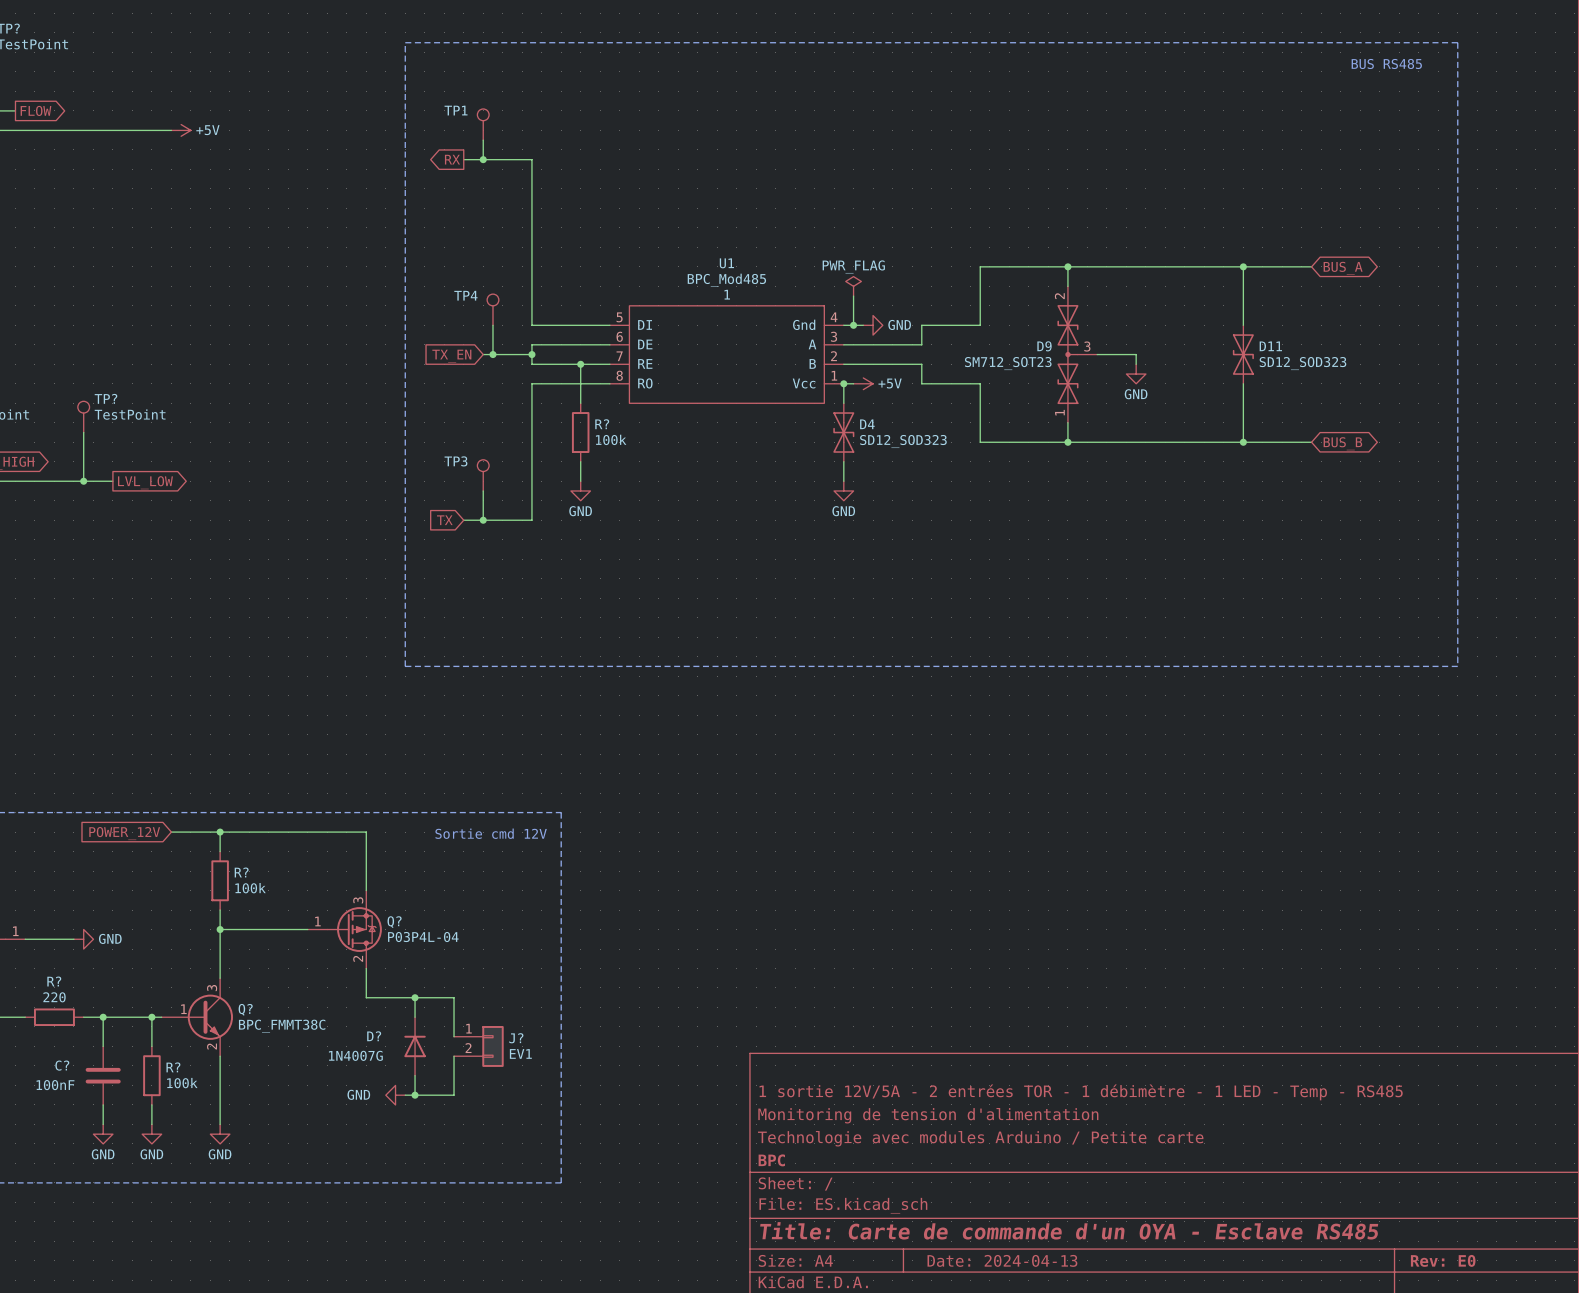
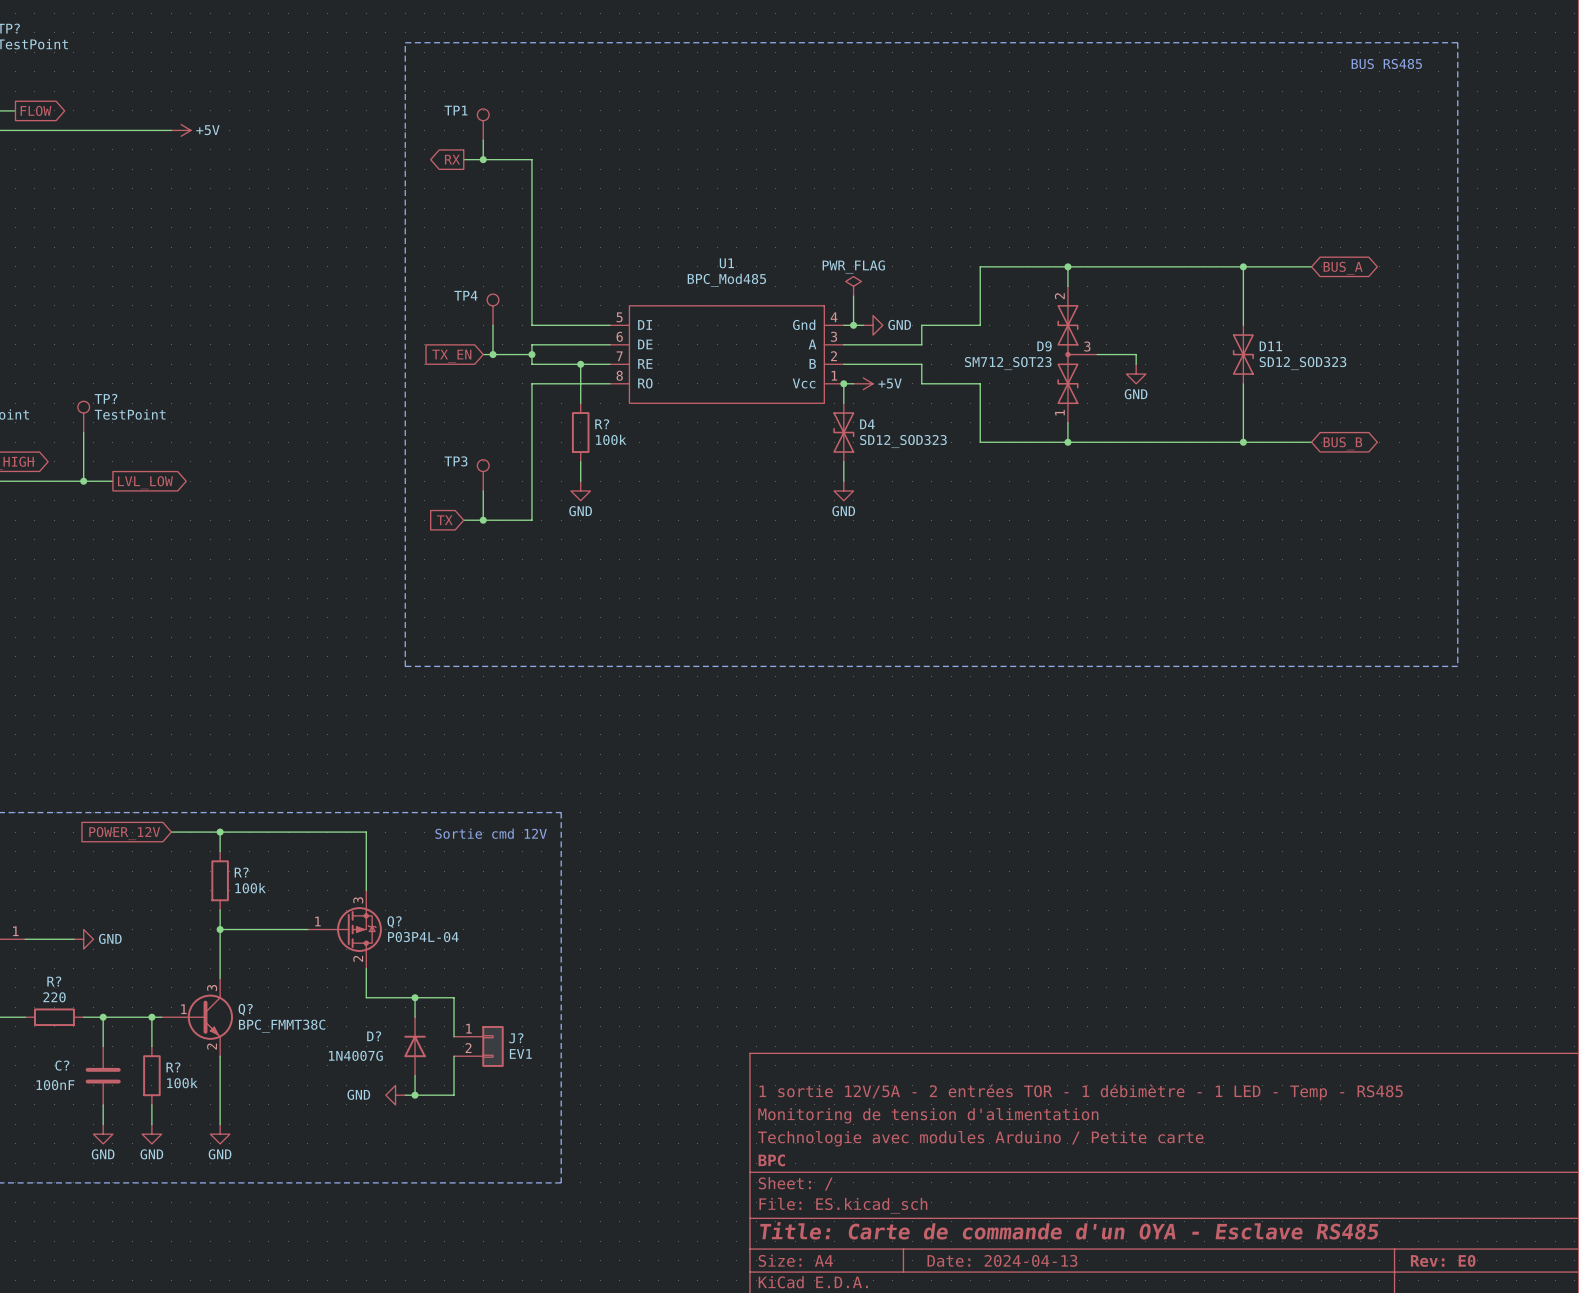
U1 text: 1 (727, 294) -> none

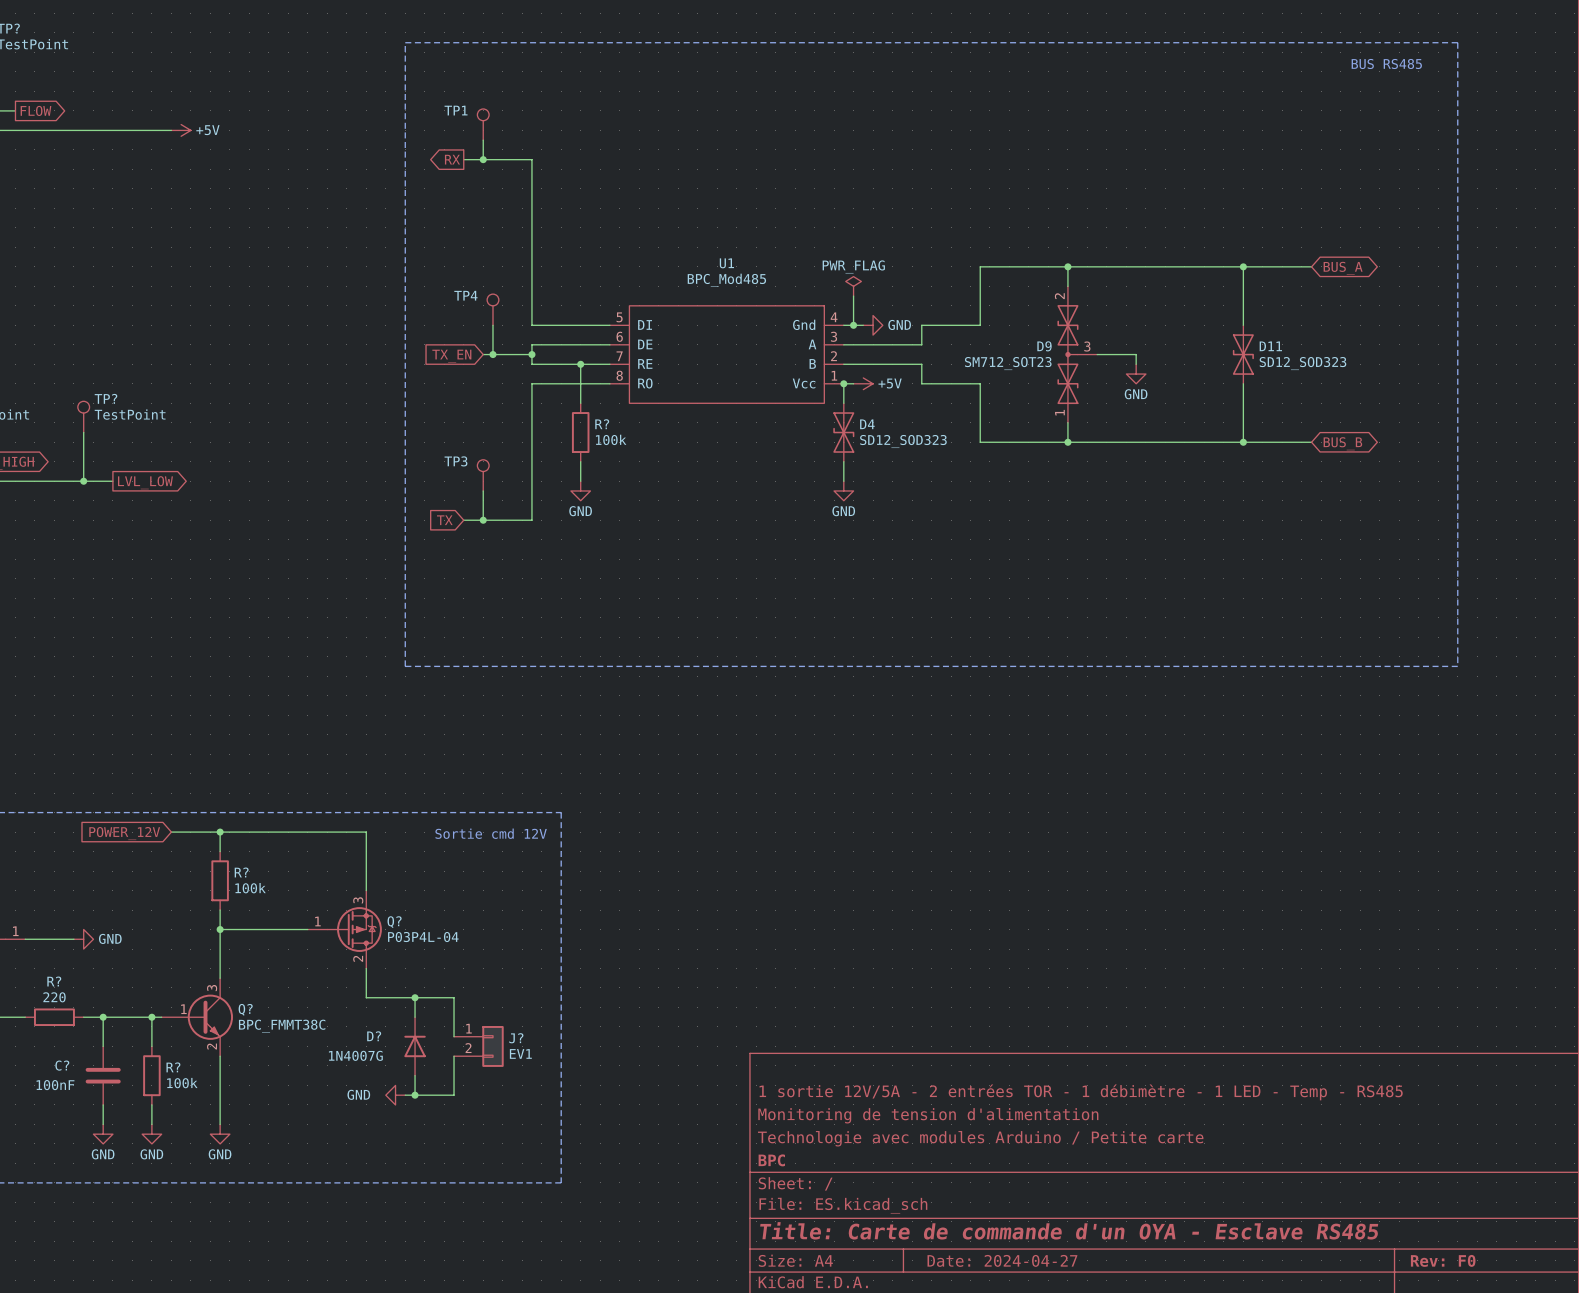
title block: Date: 2024-04-13 (1002, 1260) -> Date: 2024-04-27 (1002, 1260)
title block: Rev: E0 (1443, 1260) -> Rev: F0 (1443, 1260)

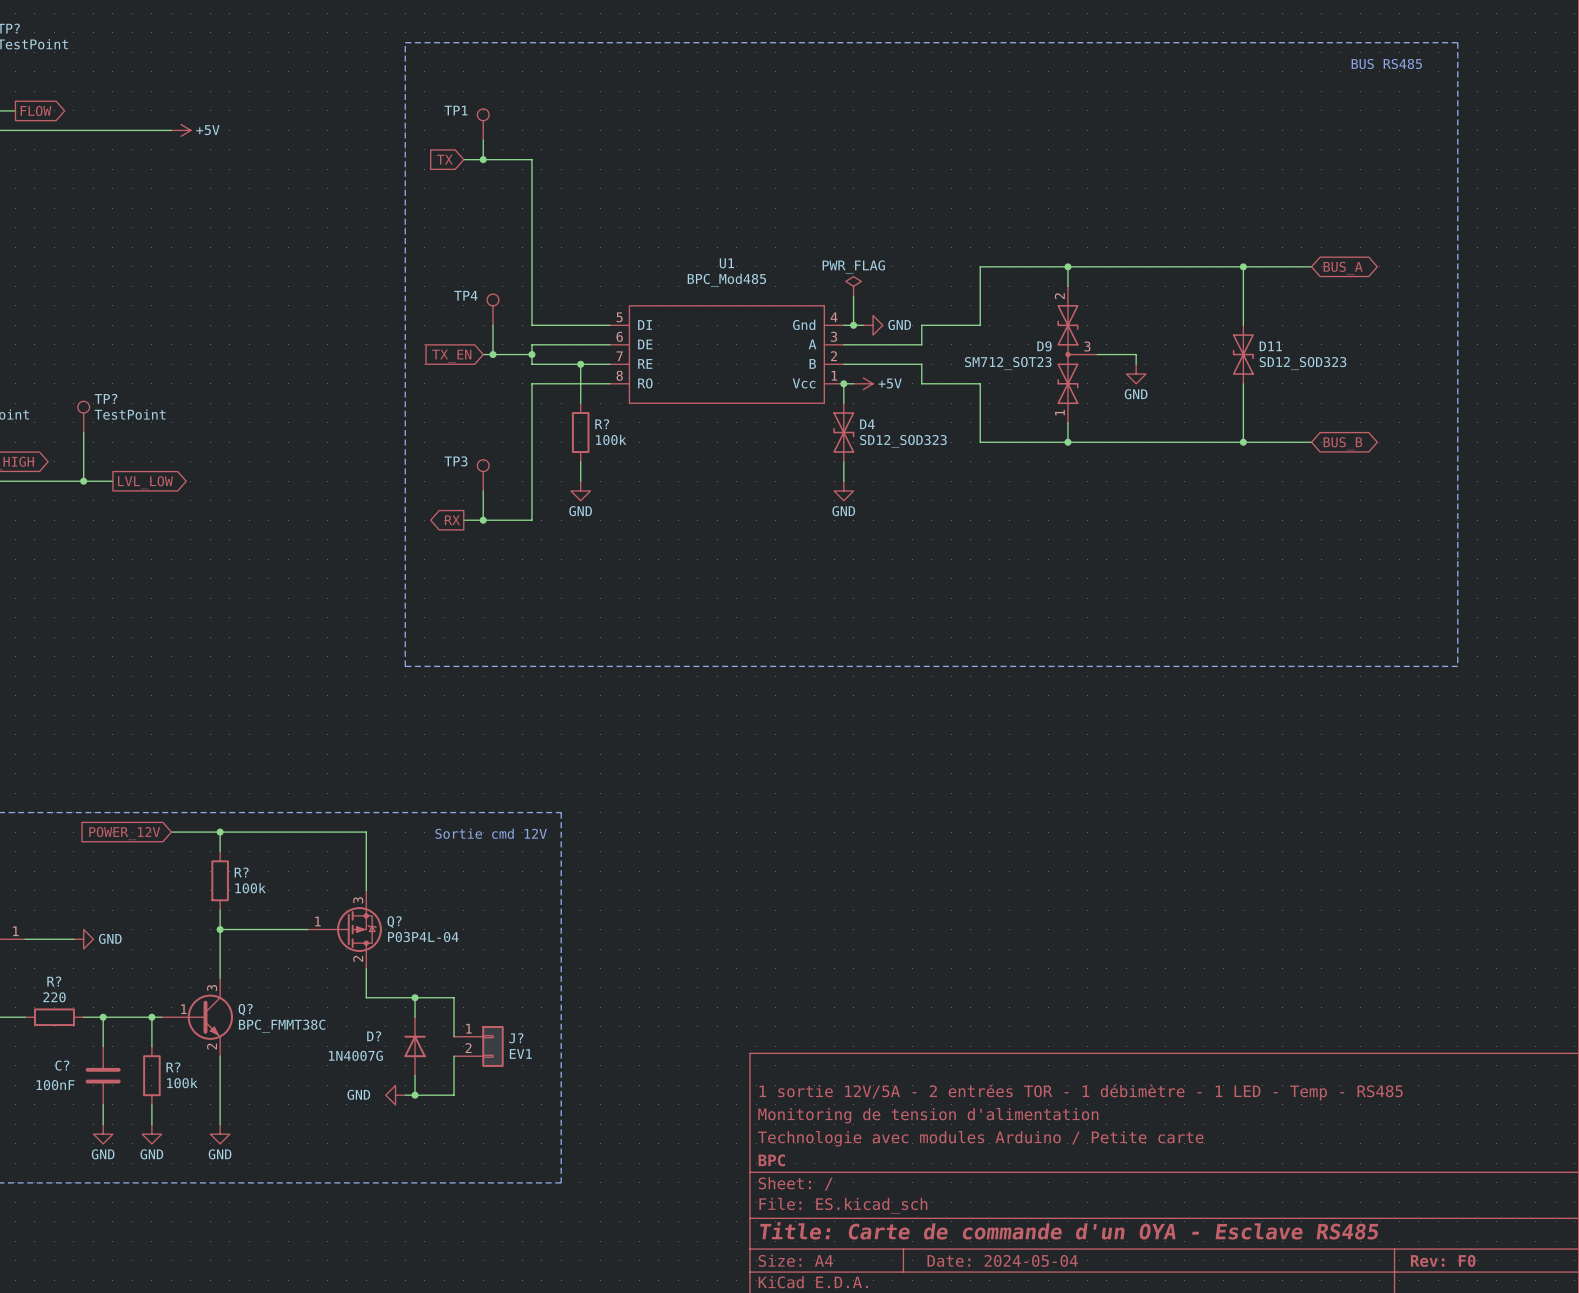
global label shape: output (452, 159) -> input (444, 159)
global label: RX (452, 159) -> TX (444, 159)
global label shape: input (444, 520) -> output (452, 520)
global label: TX (444, 520) -> RX (452, 520)
title block: Date: 2024-04-27 (1002, 1260) -> Date: 2024-05-04 (1002, 1260)

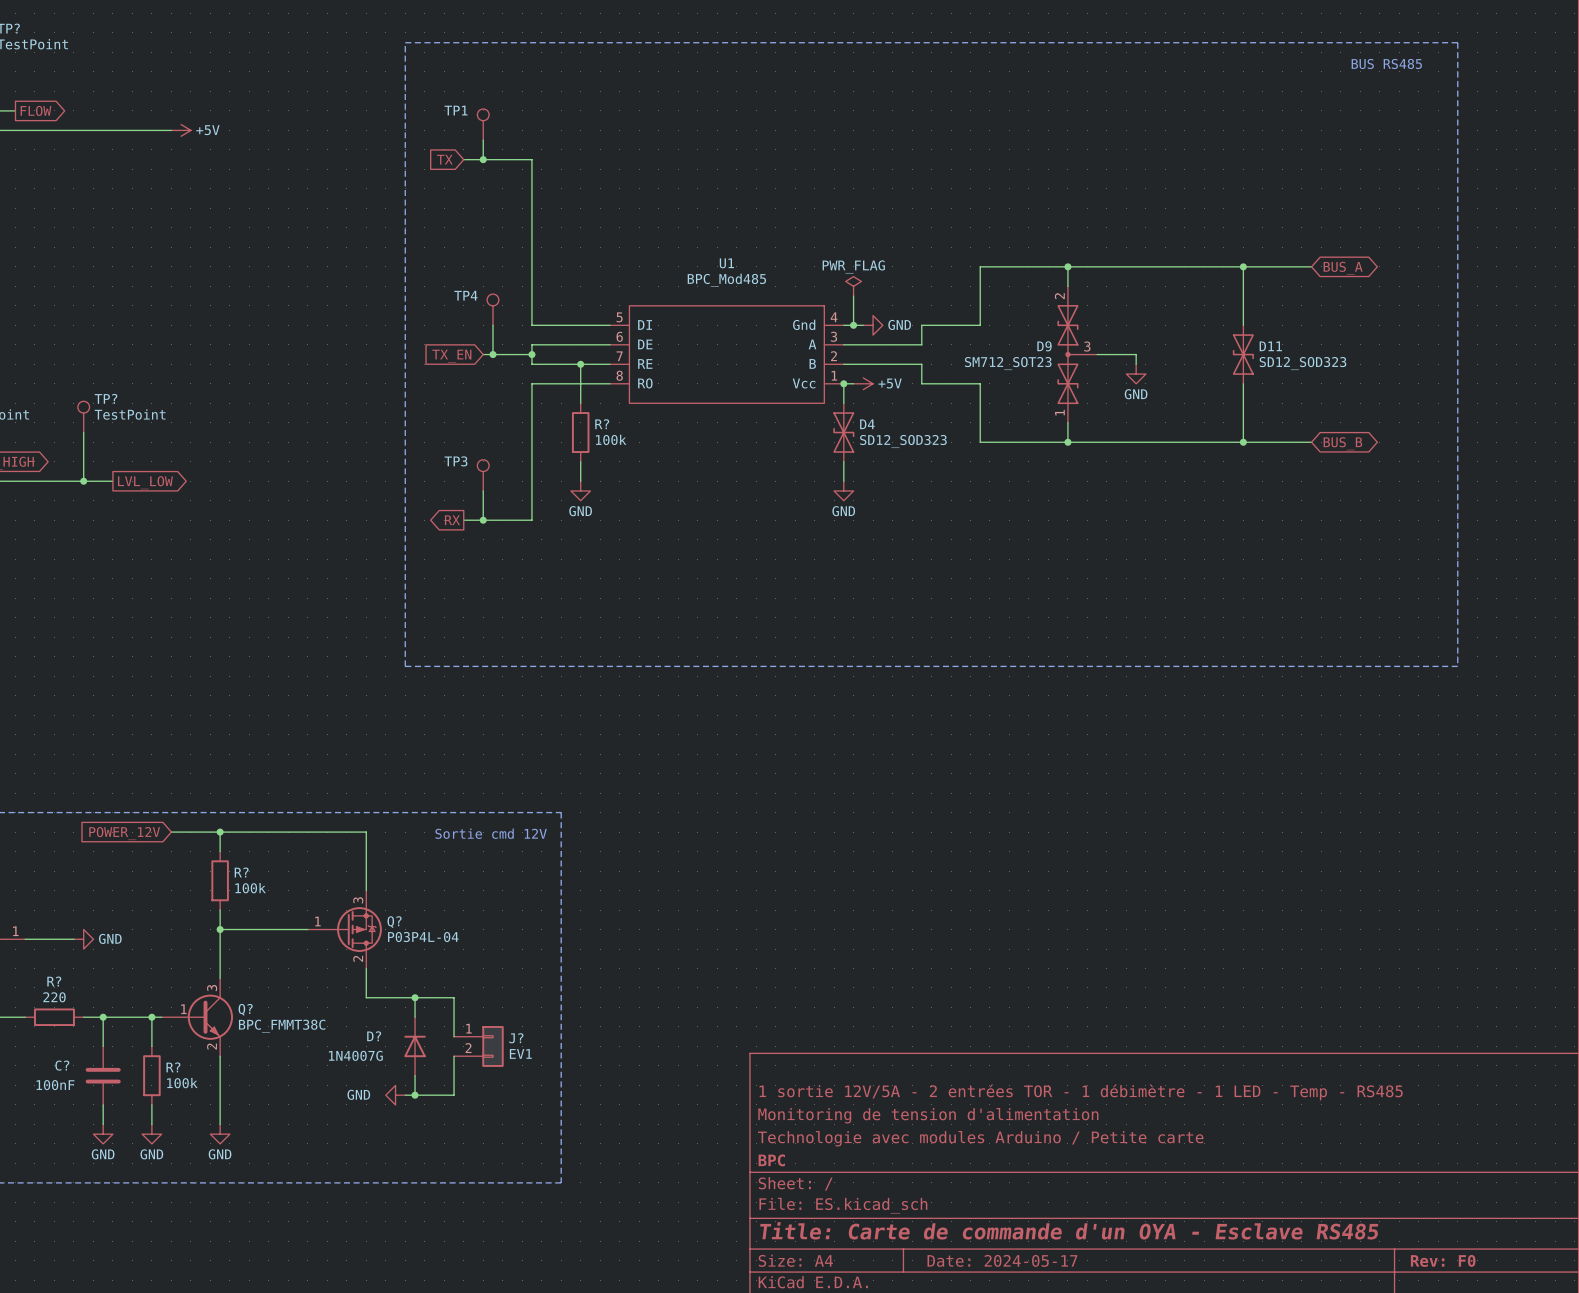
title block: Date: 2024-05-04 (1002, 1260) -> Date: 2024-05-17 (1002, 1260)

